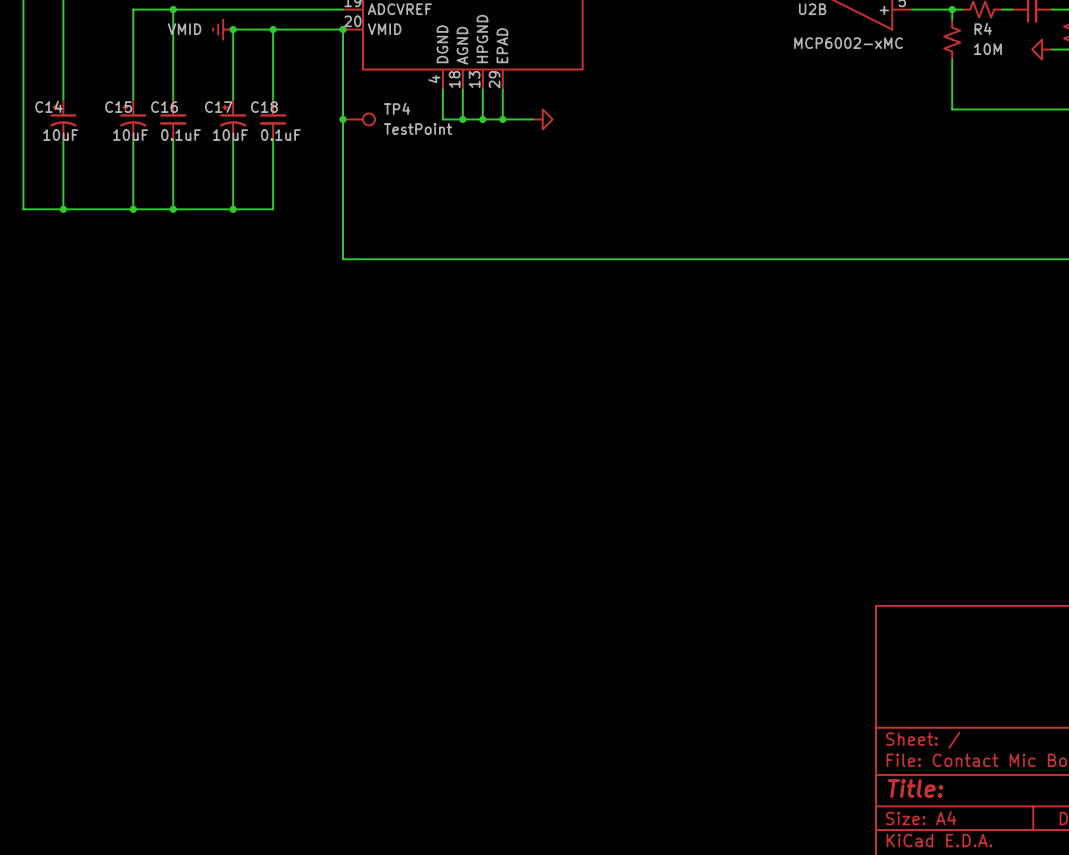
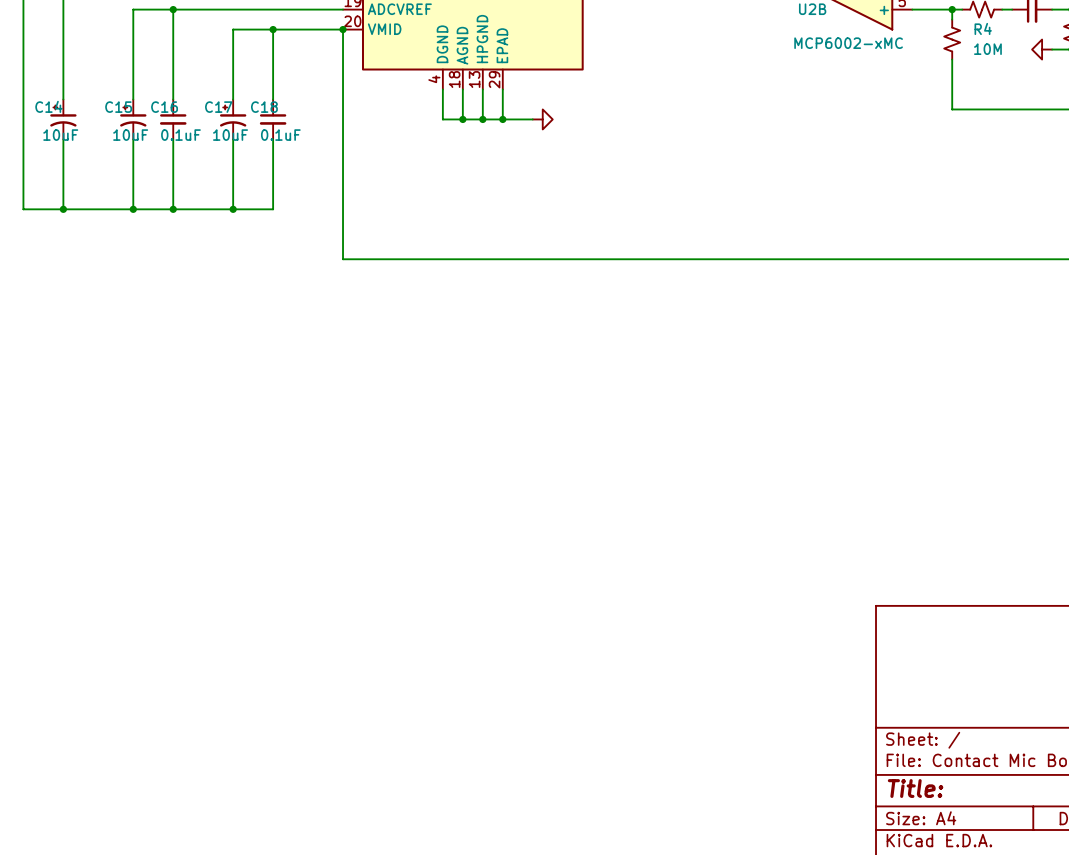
power symbol: VMID (223, 29) -> none
junction: (233, 29) -> none
junction: (343, 119) -> none
TP4: TestPoint (358, 119) -> none

